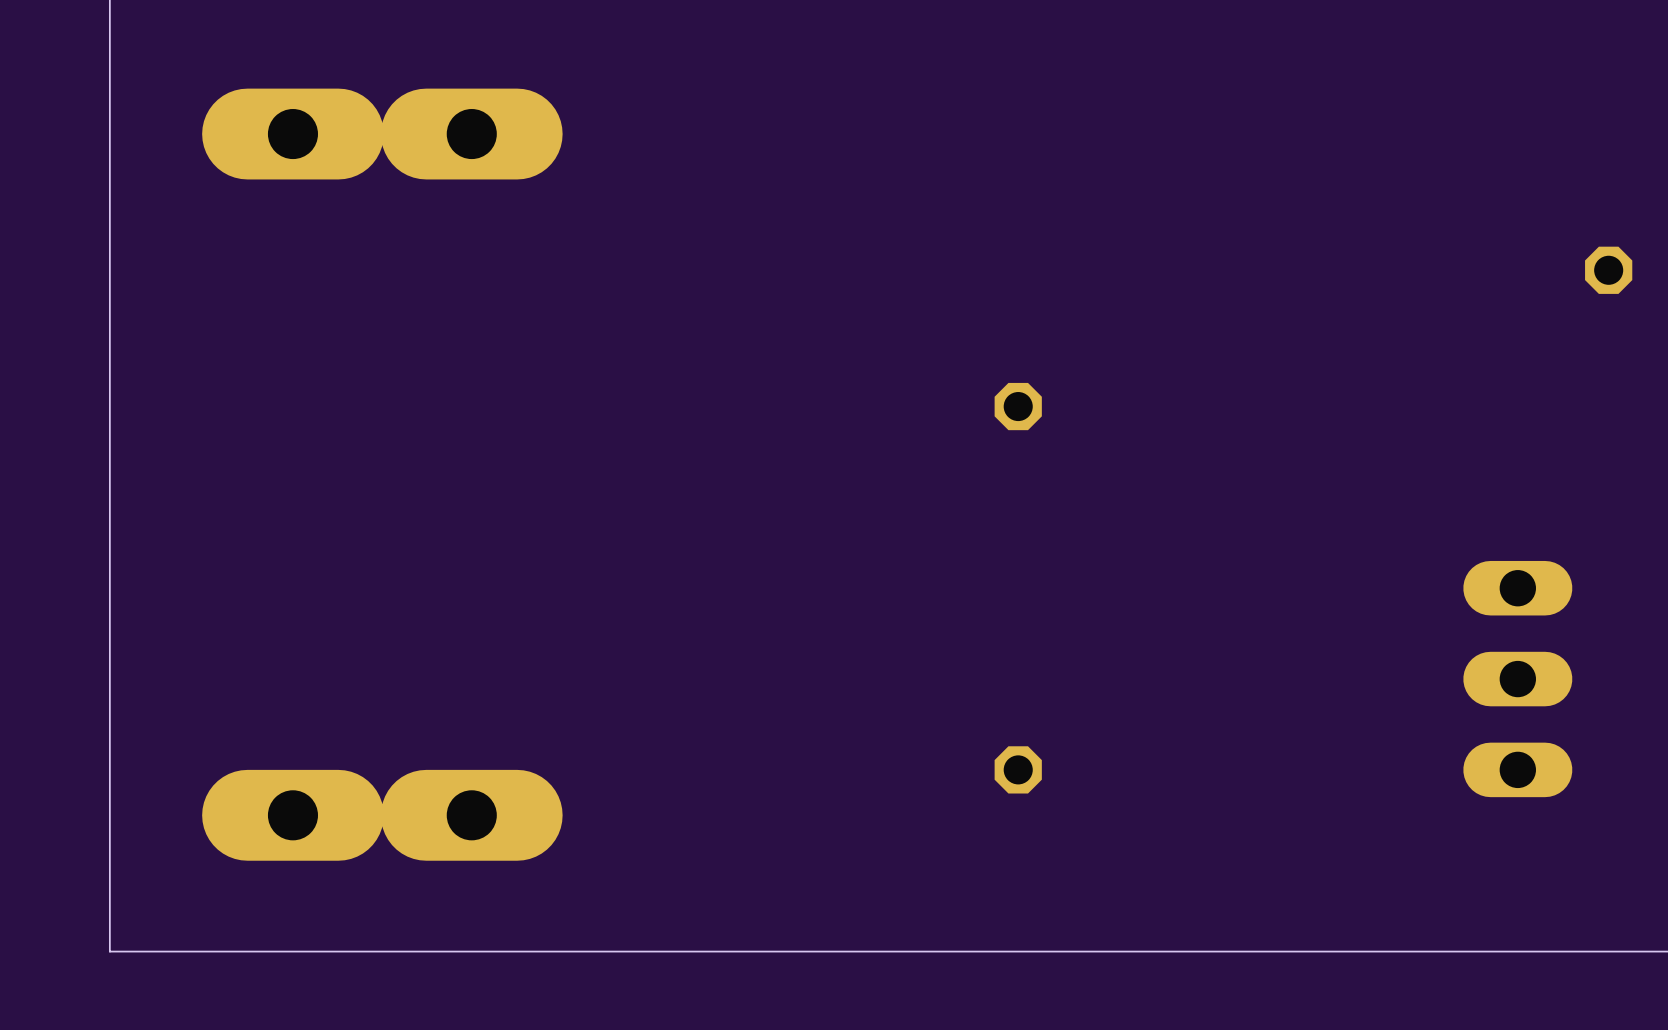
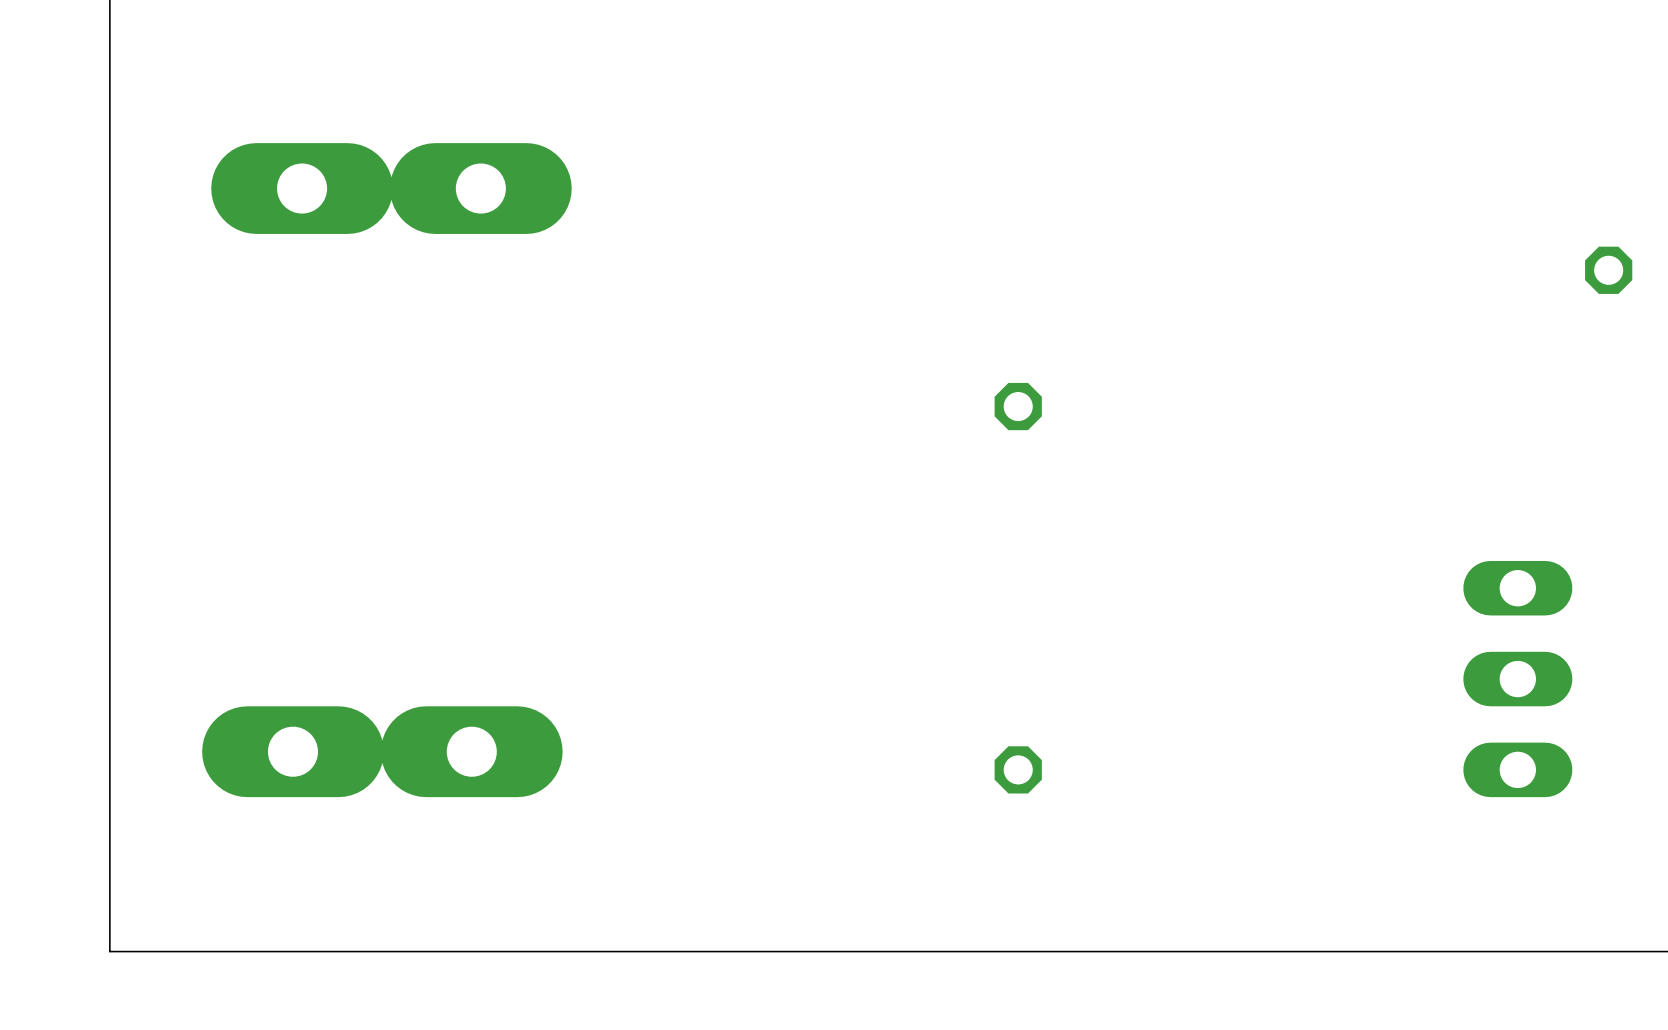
part position: (382, 134) -> (391, 188)
part position: (382, 815) -> (382, 751)

